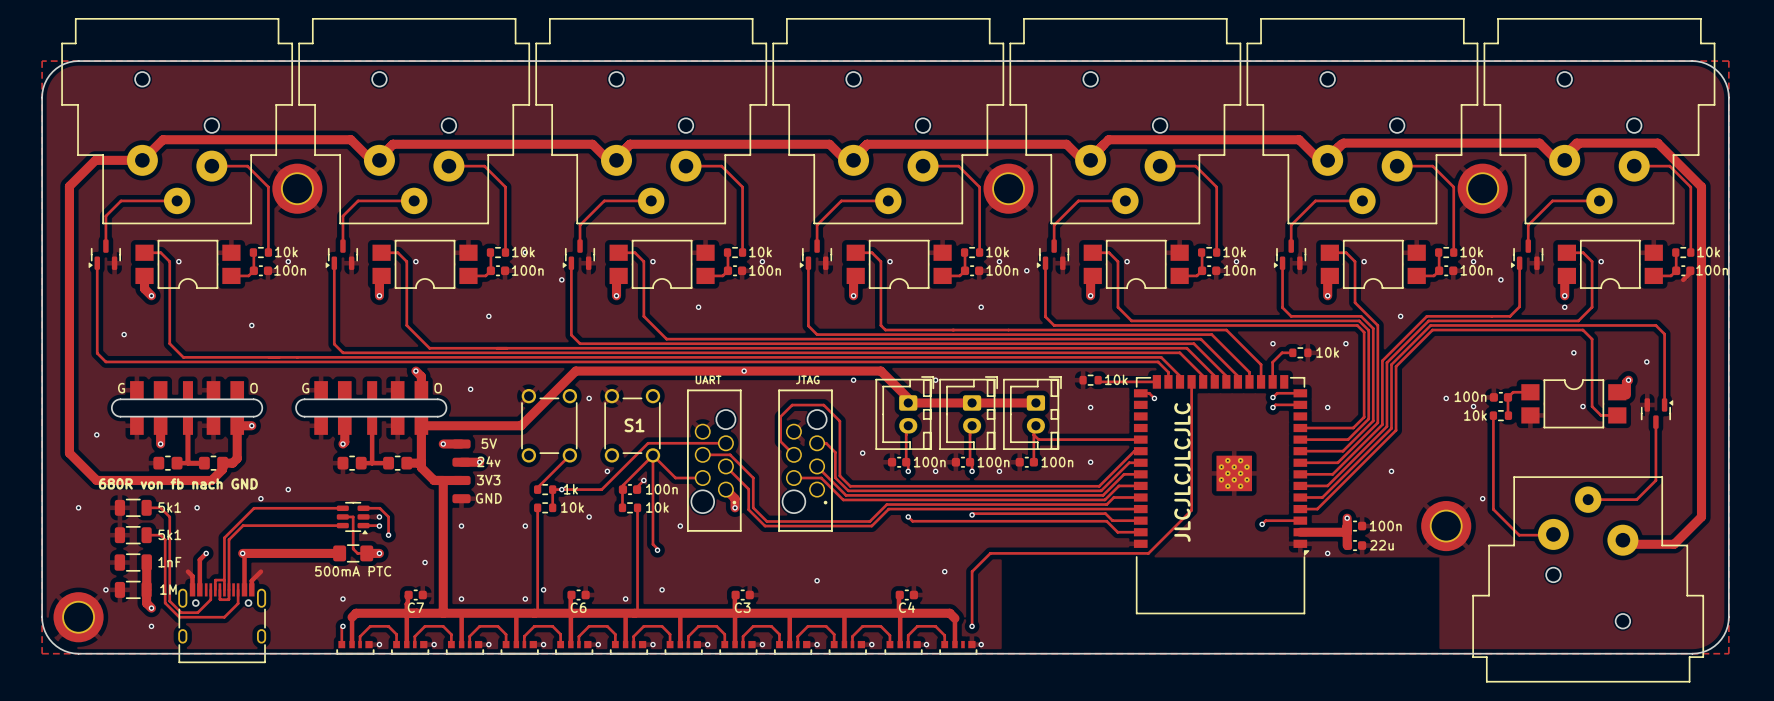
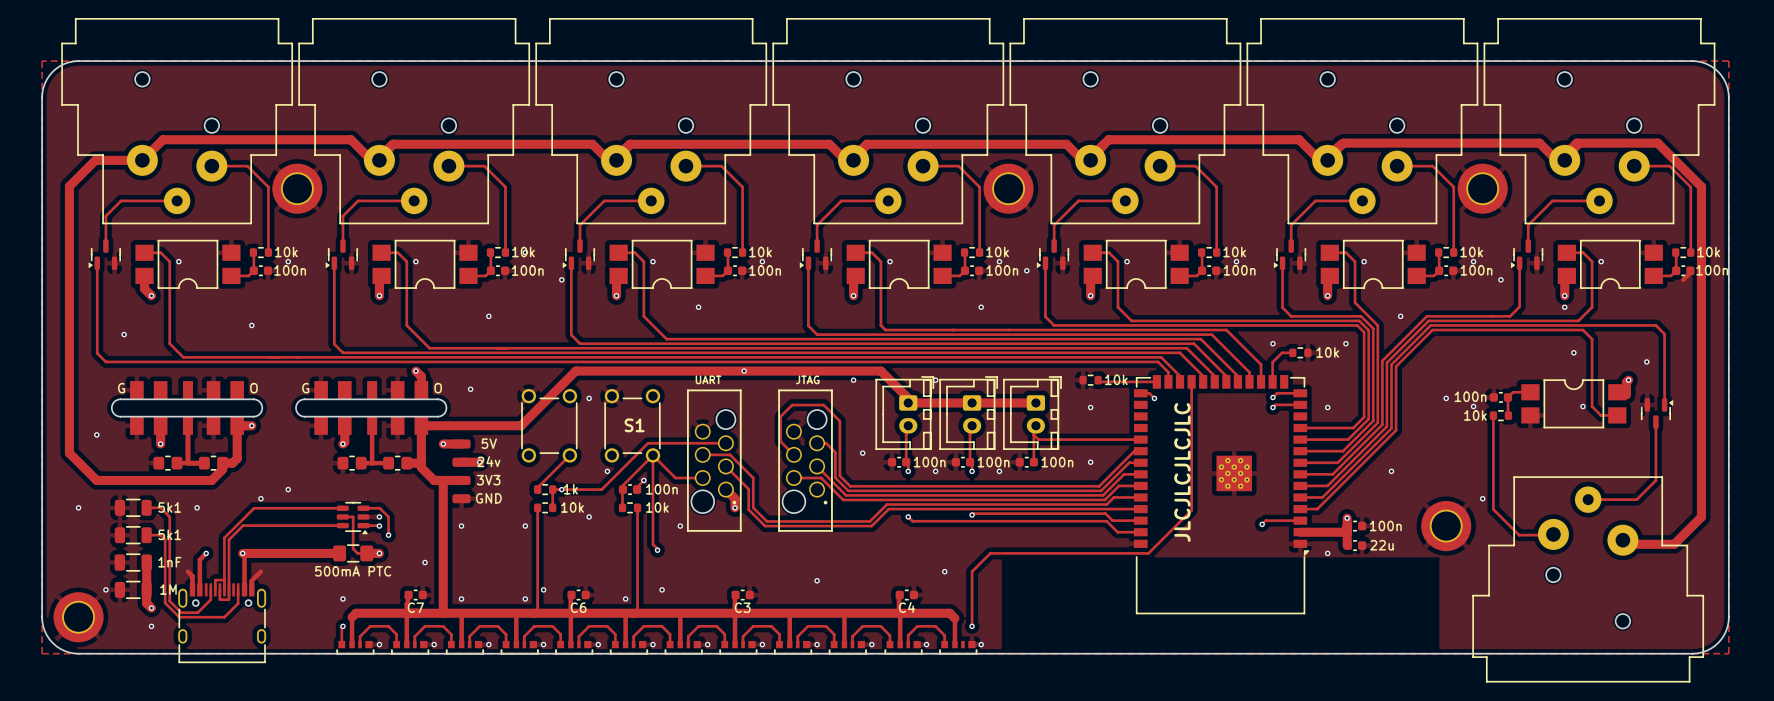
text: 680R von fb nach GND (178, 483) -> none

